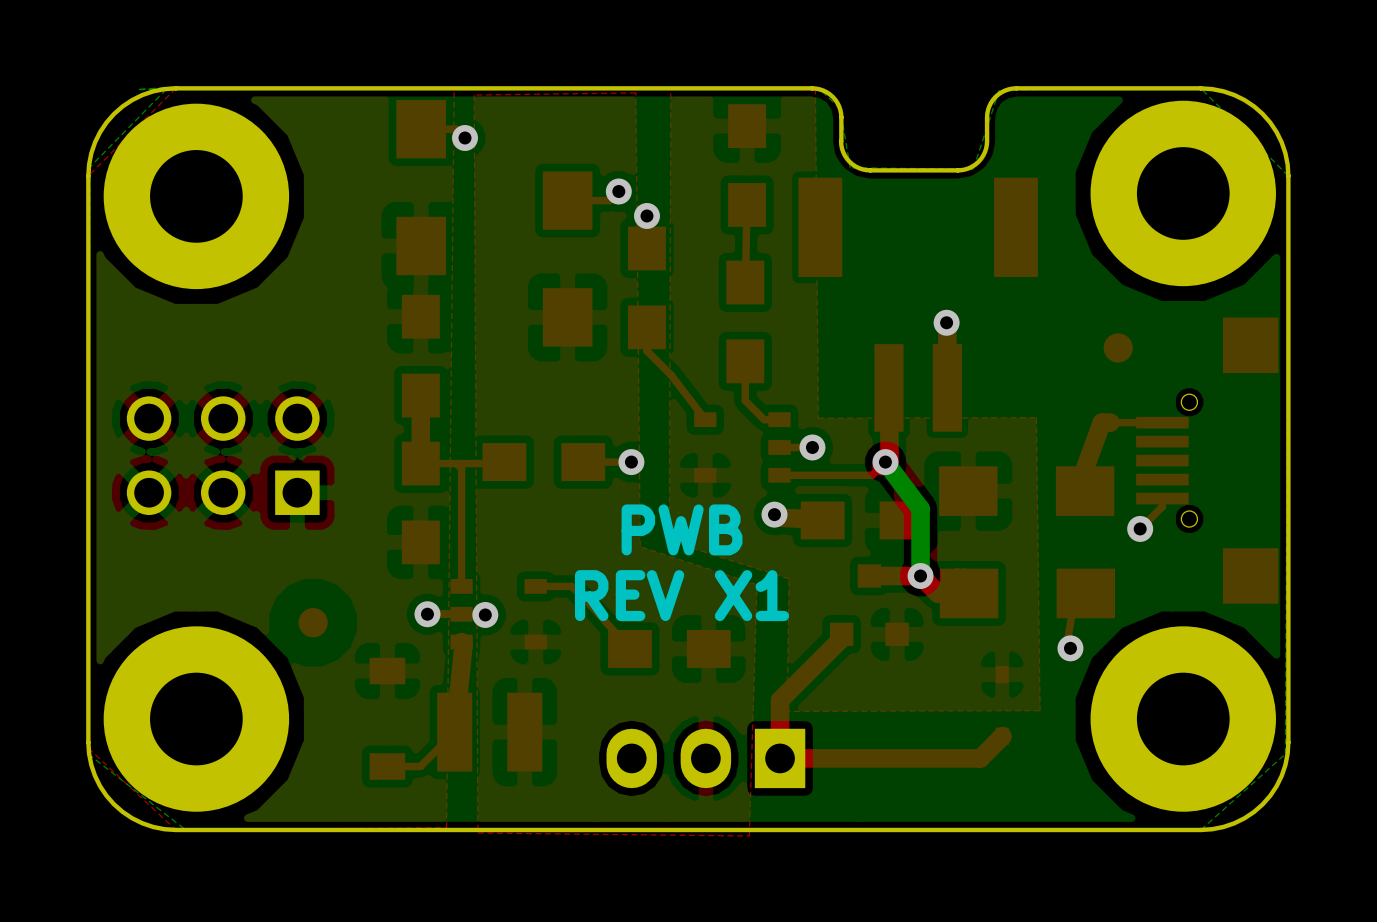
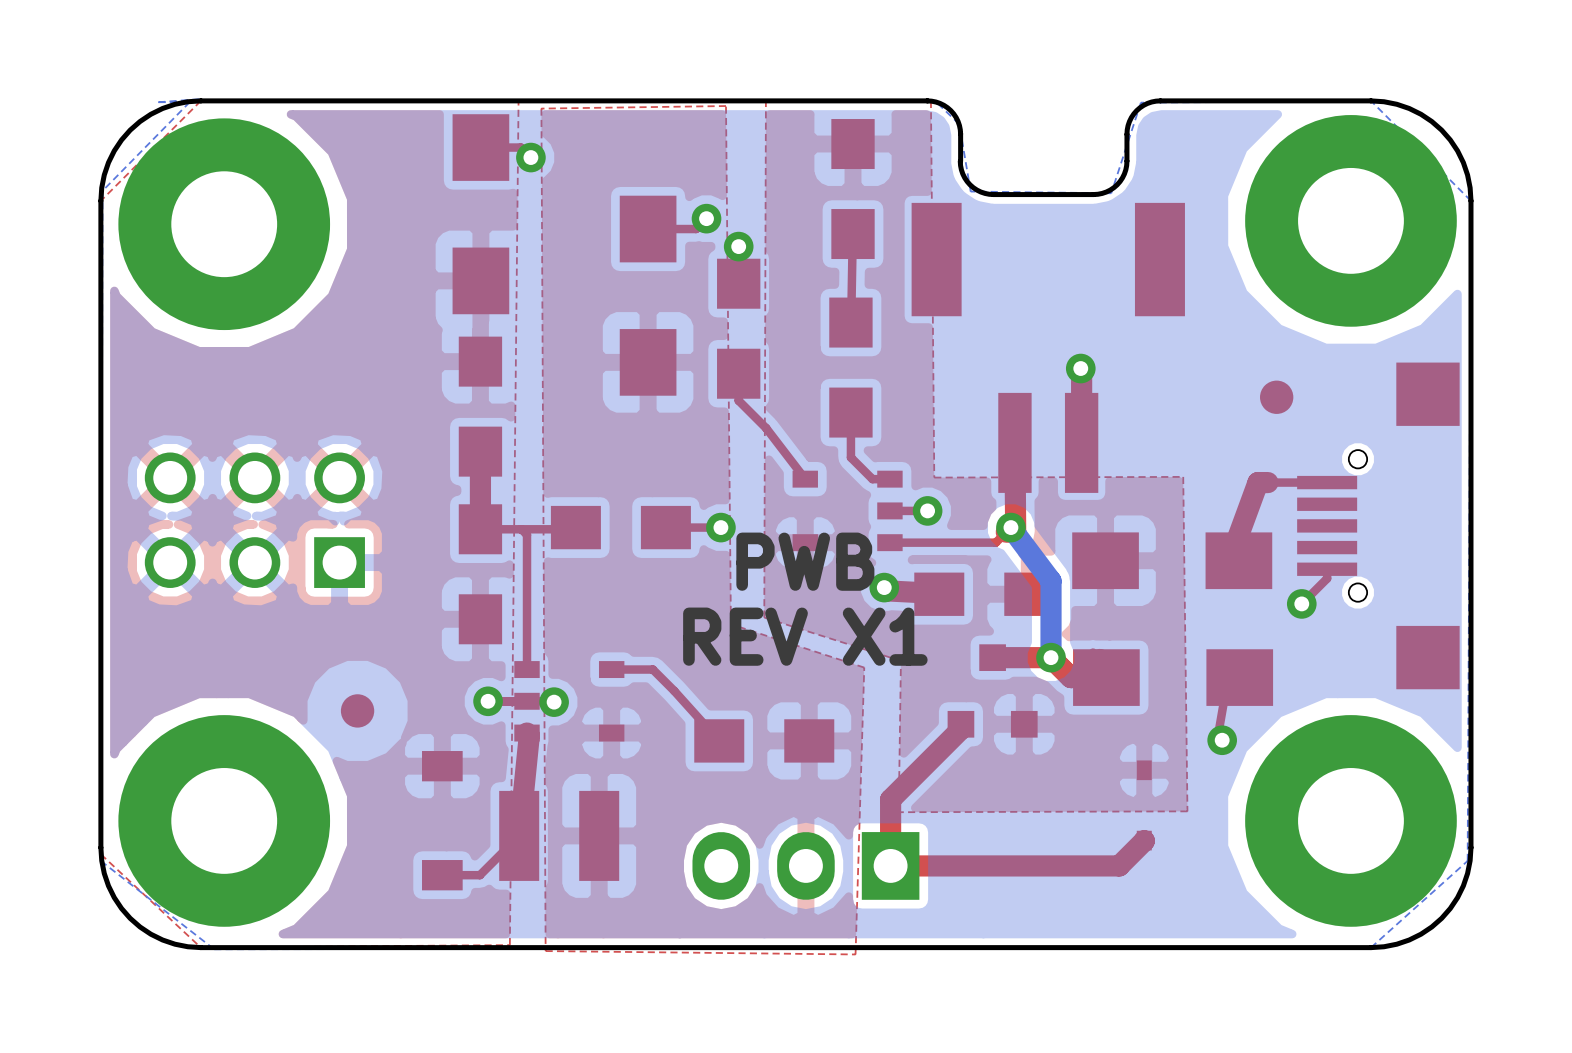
text position: PWB (682, 529) -> PWB (805, 561)
text position: REV X1 (682, 595) -> REV X1 (805, 636)

